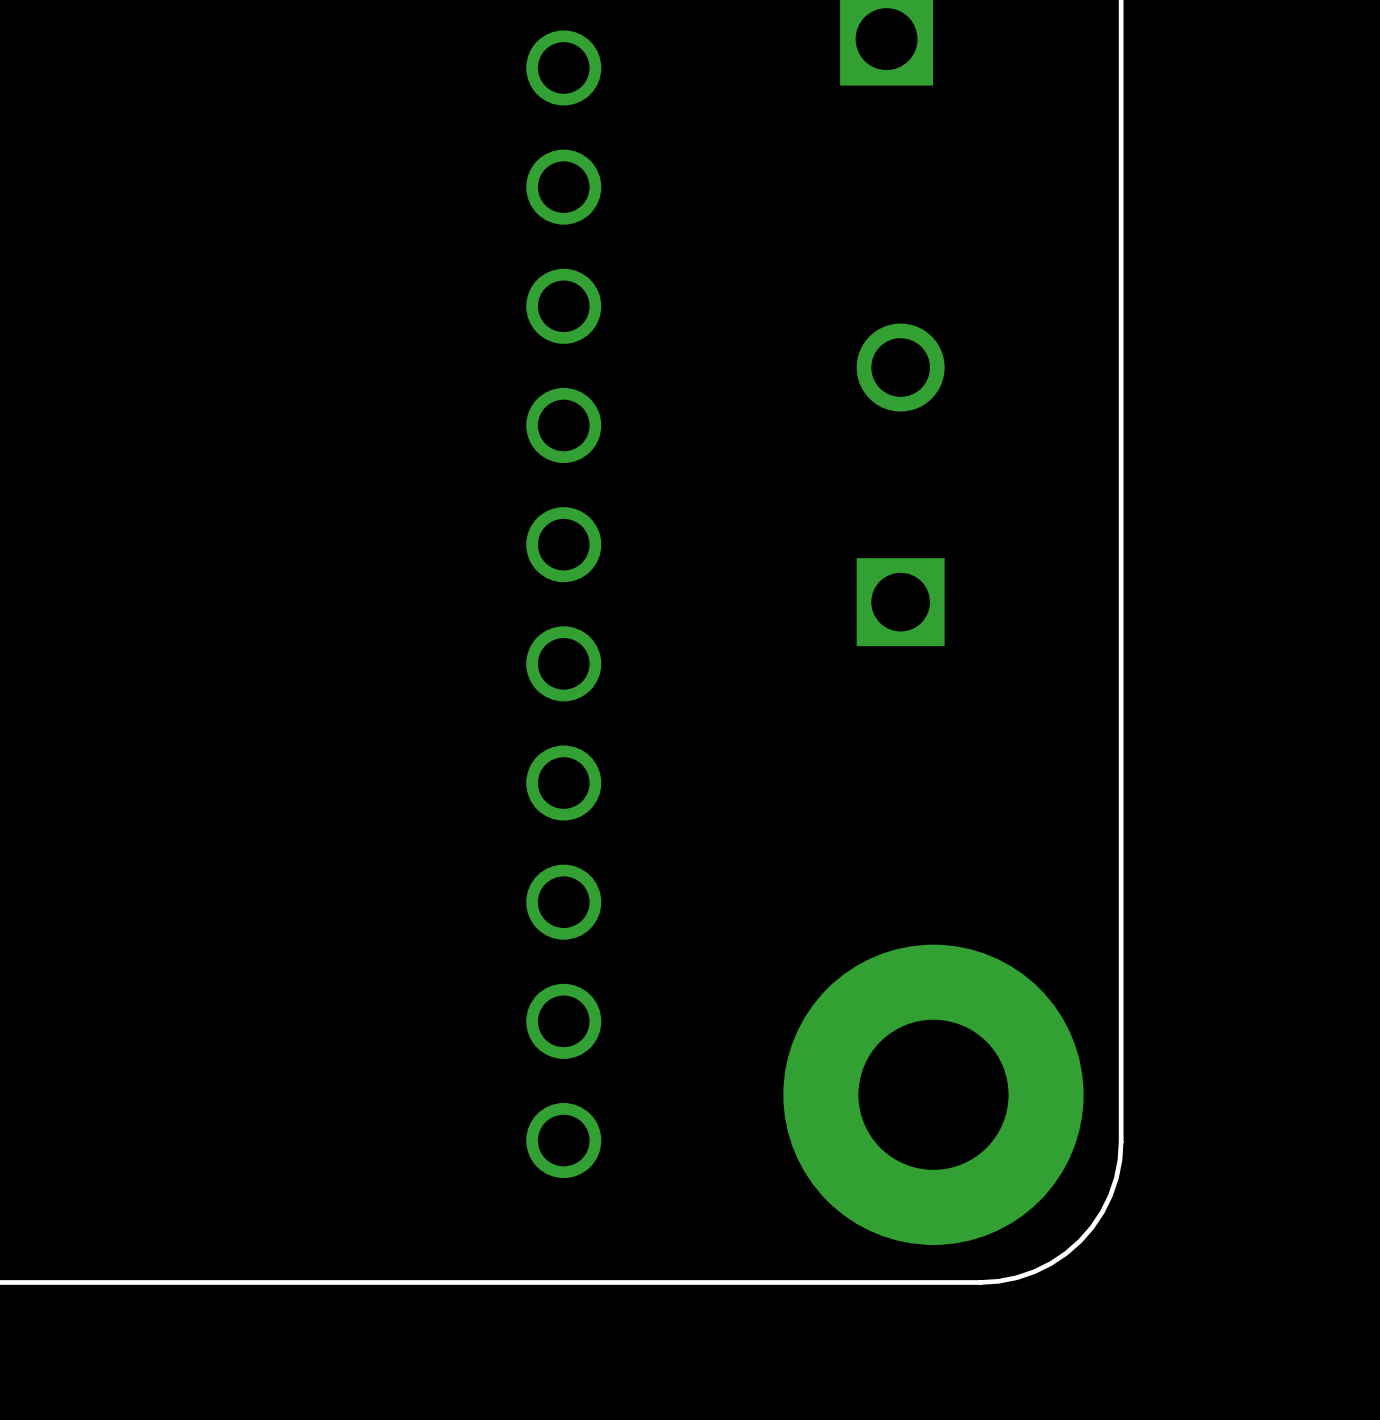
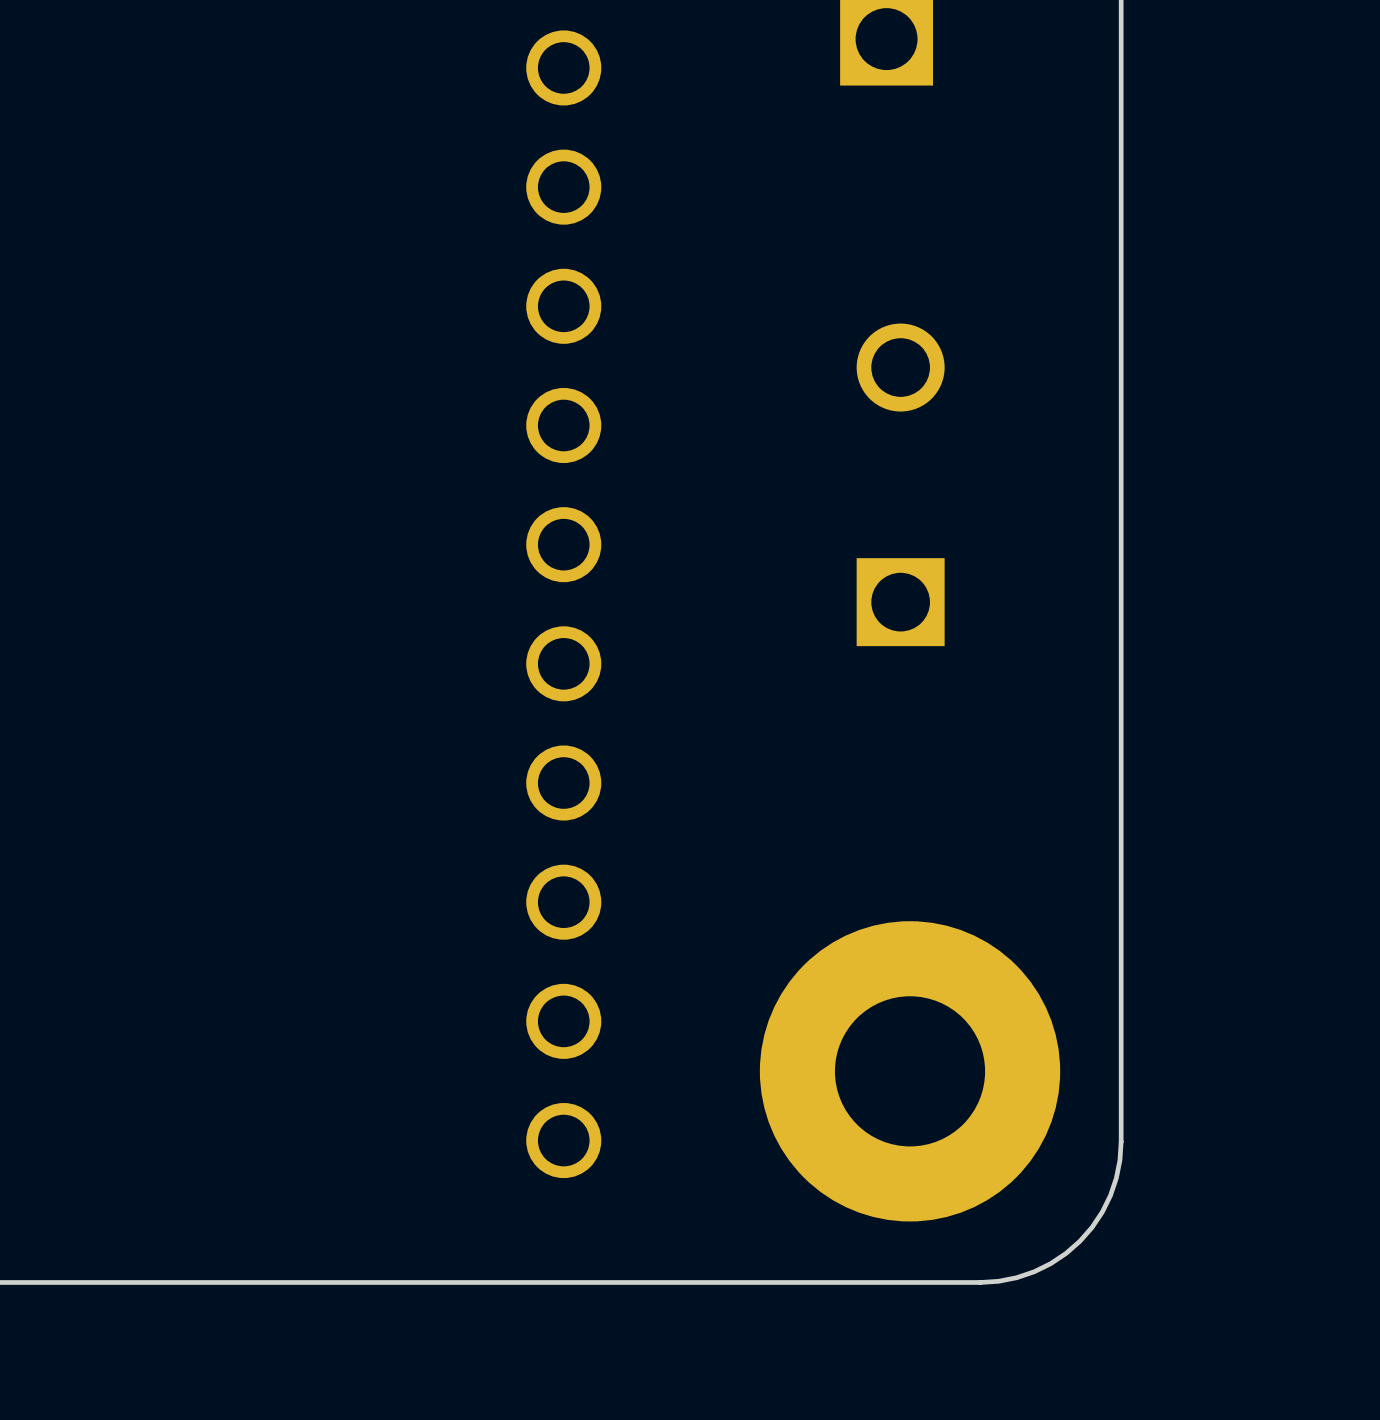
part position: (933, 1094) -> (910, 1071)

